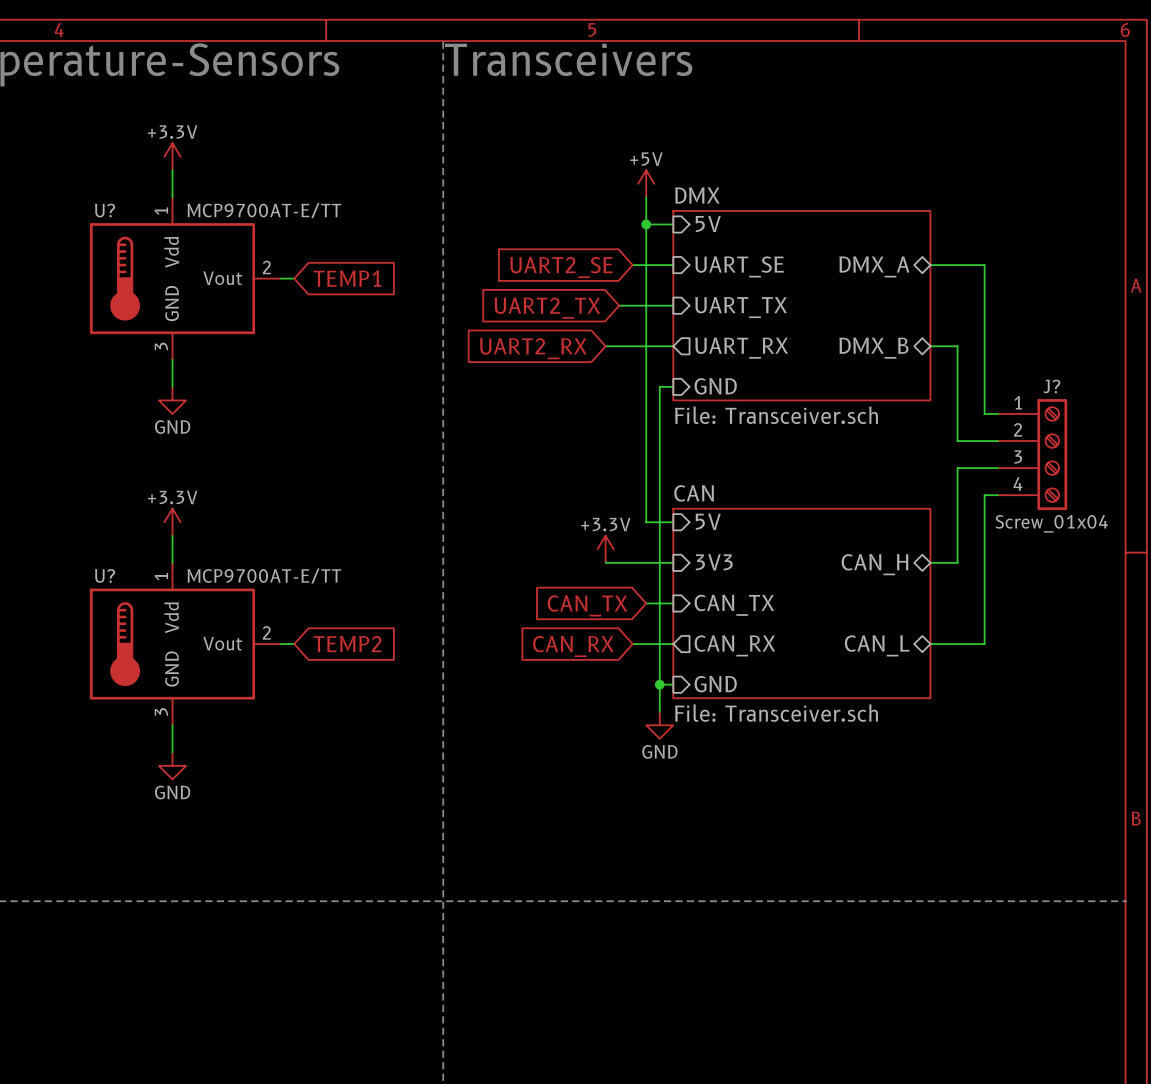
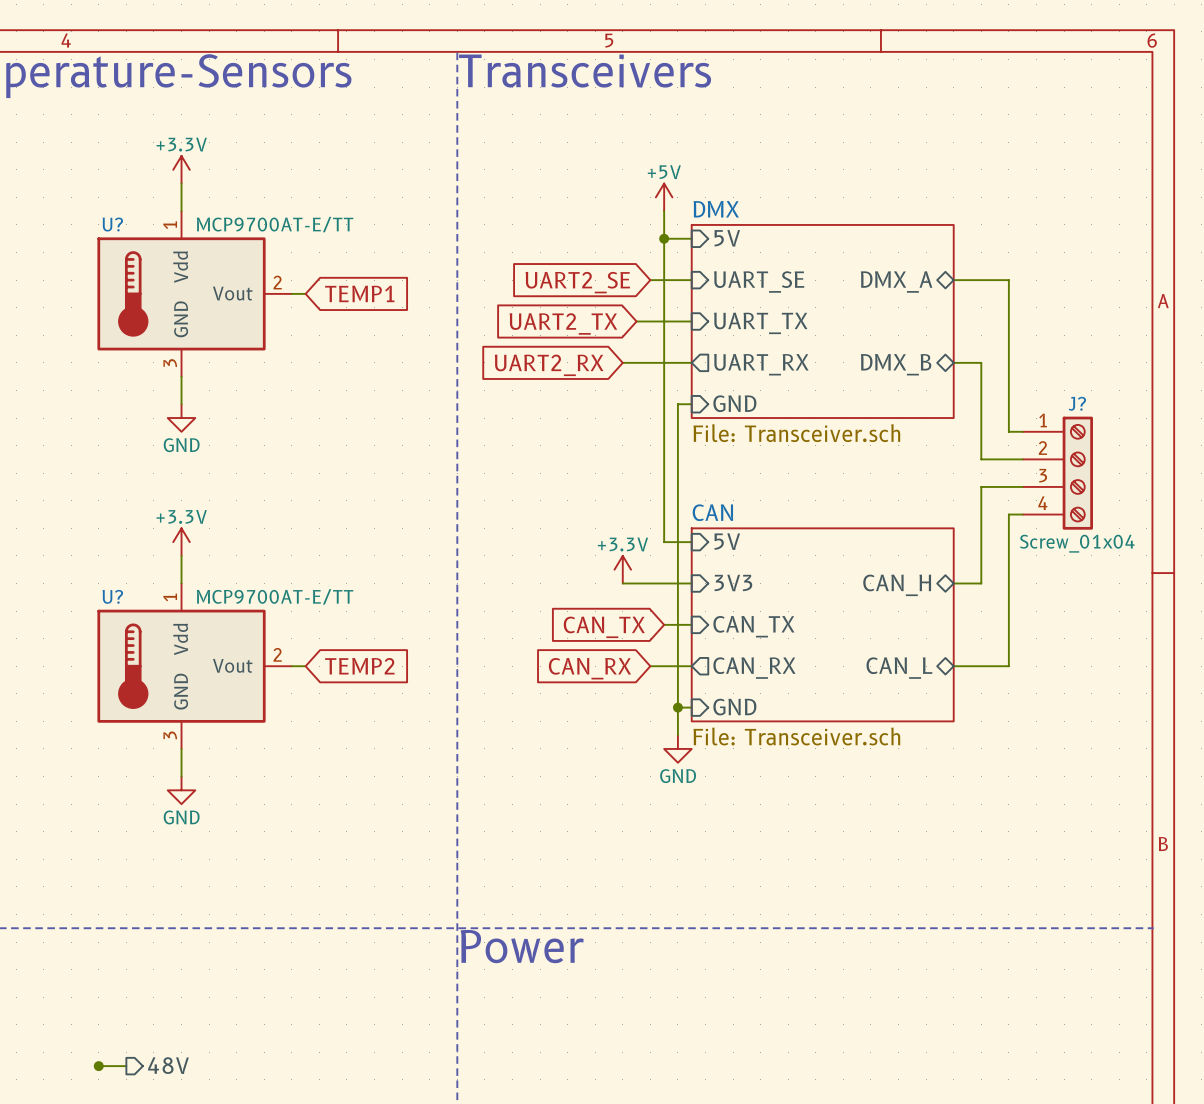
text: none -> Power (522, 946)
wire: none -> (98, 1066) (126, 1066)
junction: none -> (98, 1066)
sheet pin: none -> 48V (168, 1065)

